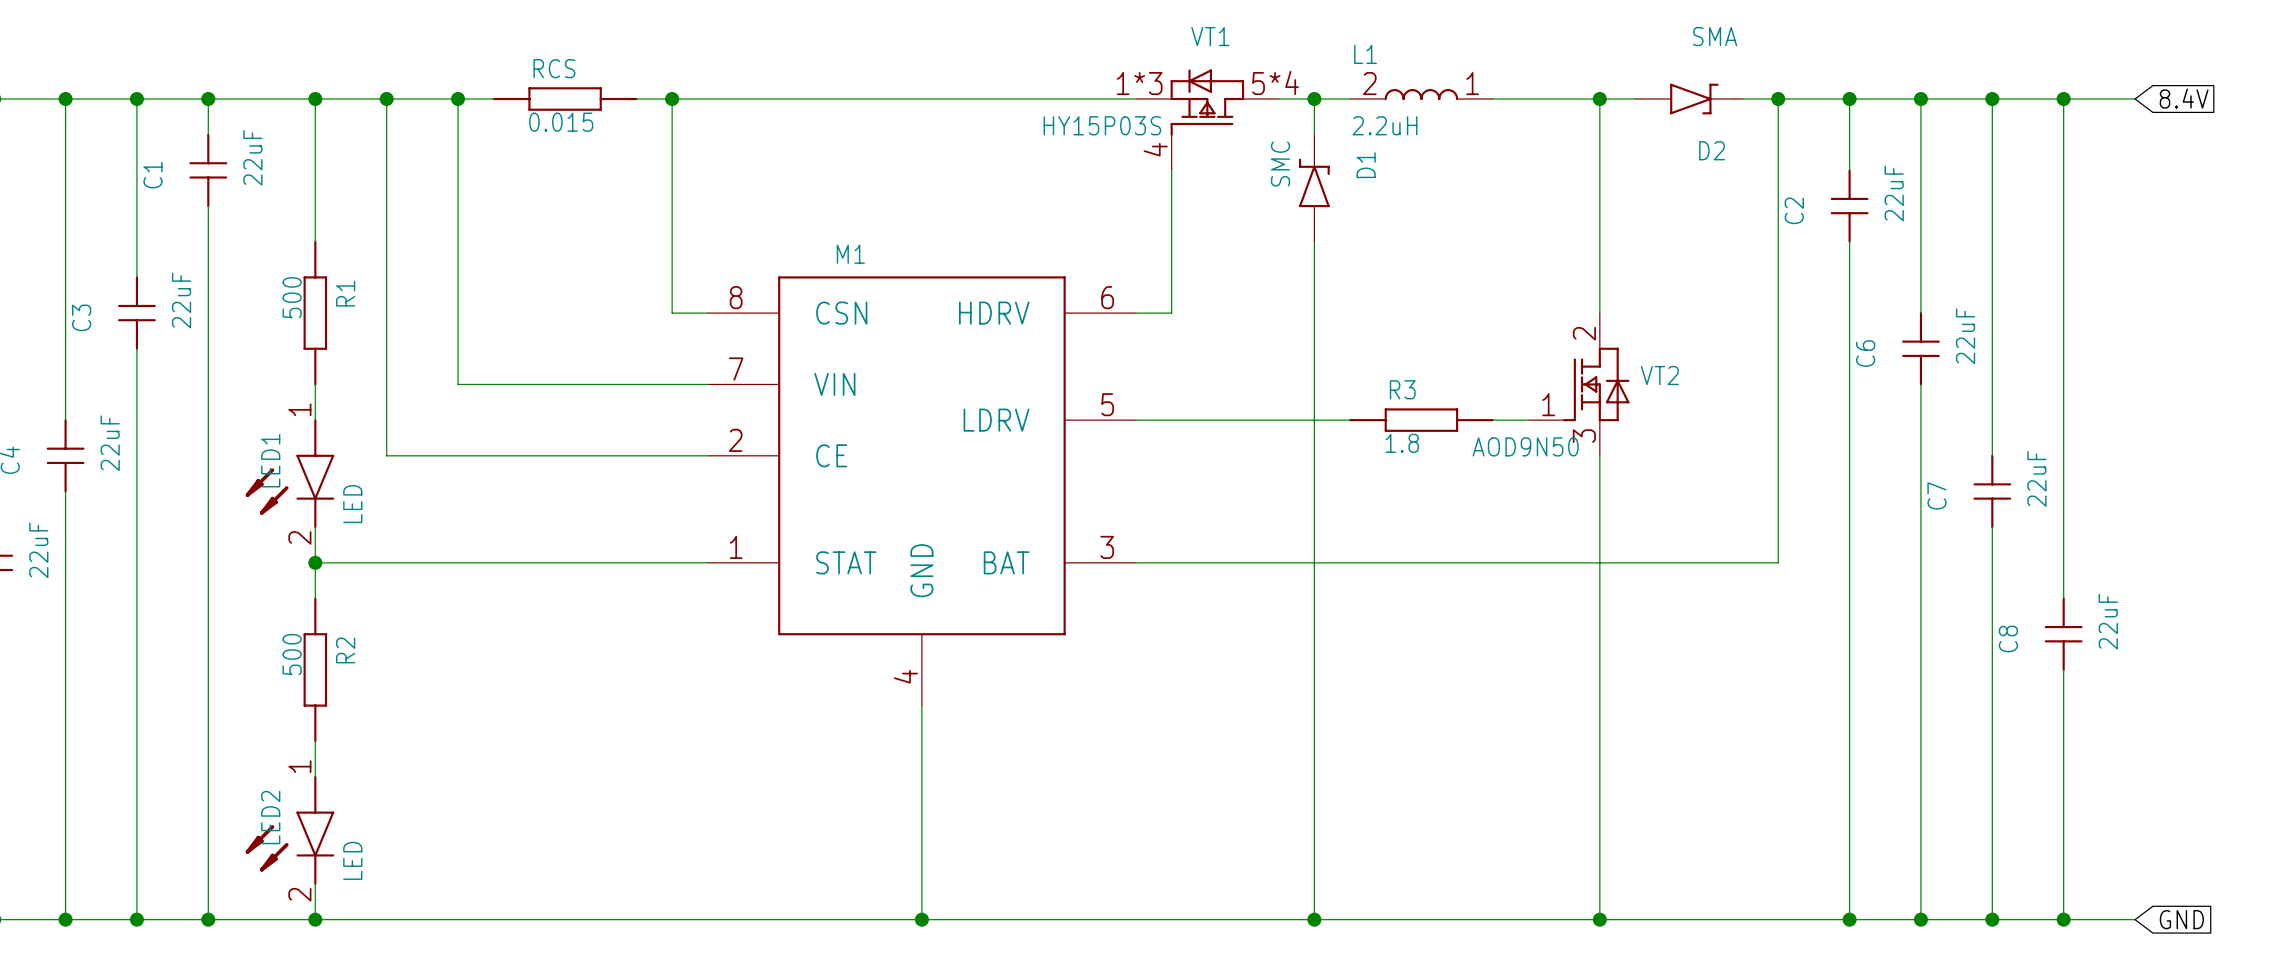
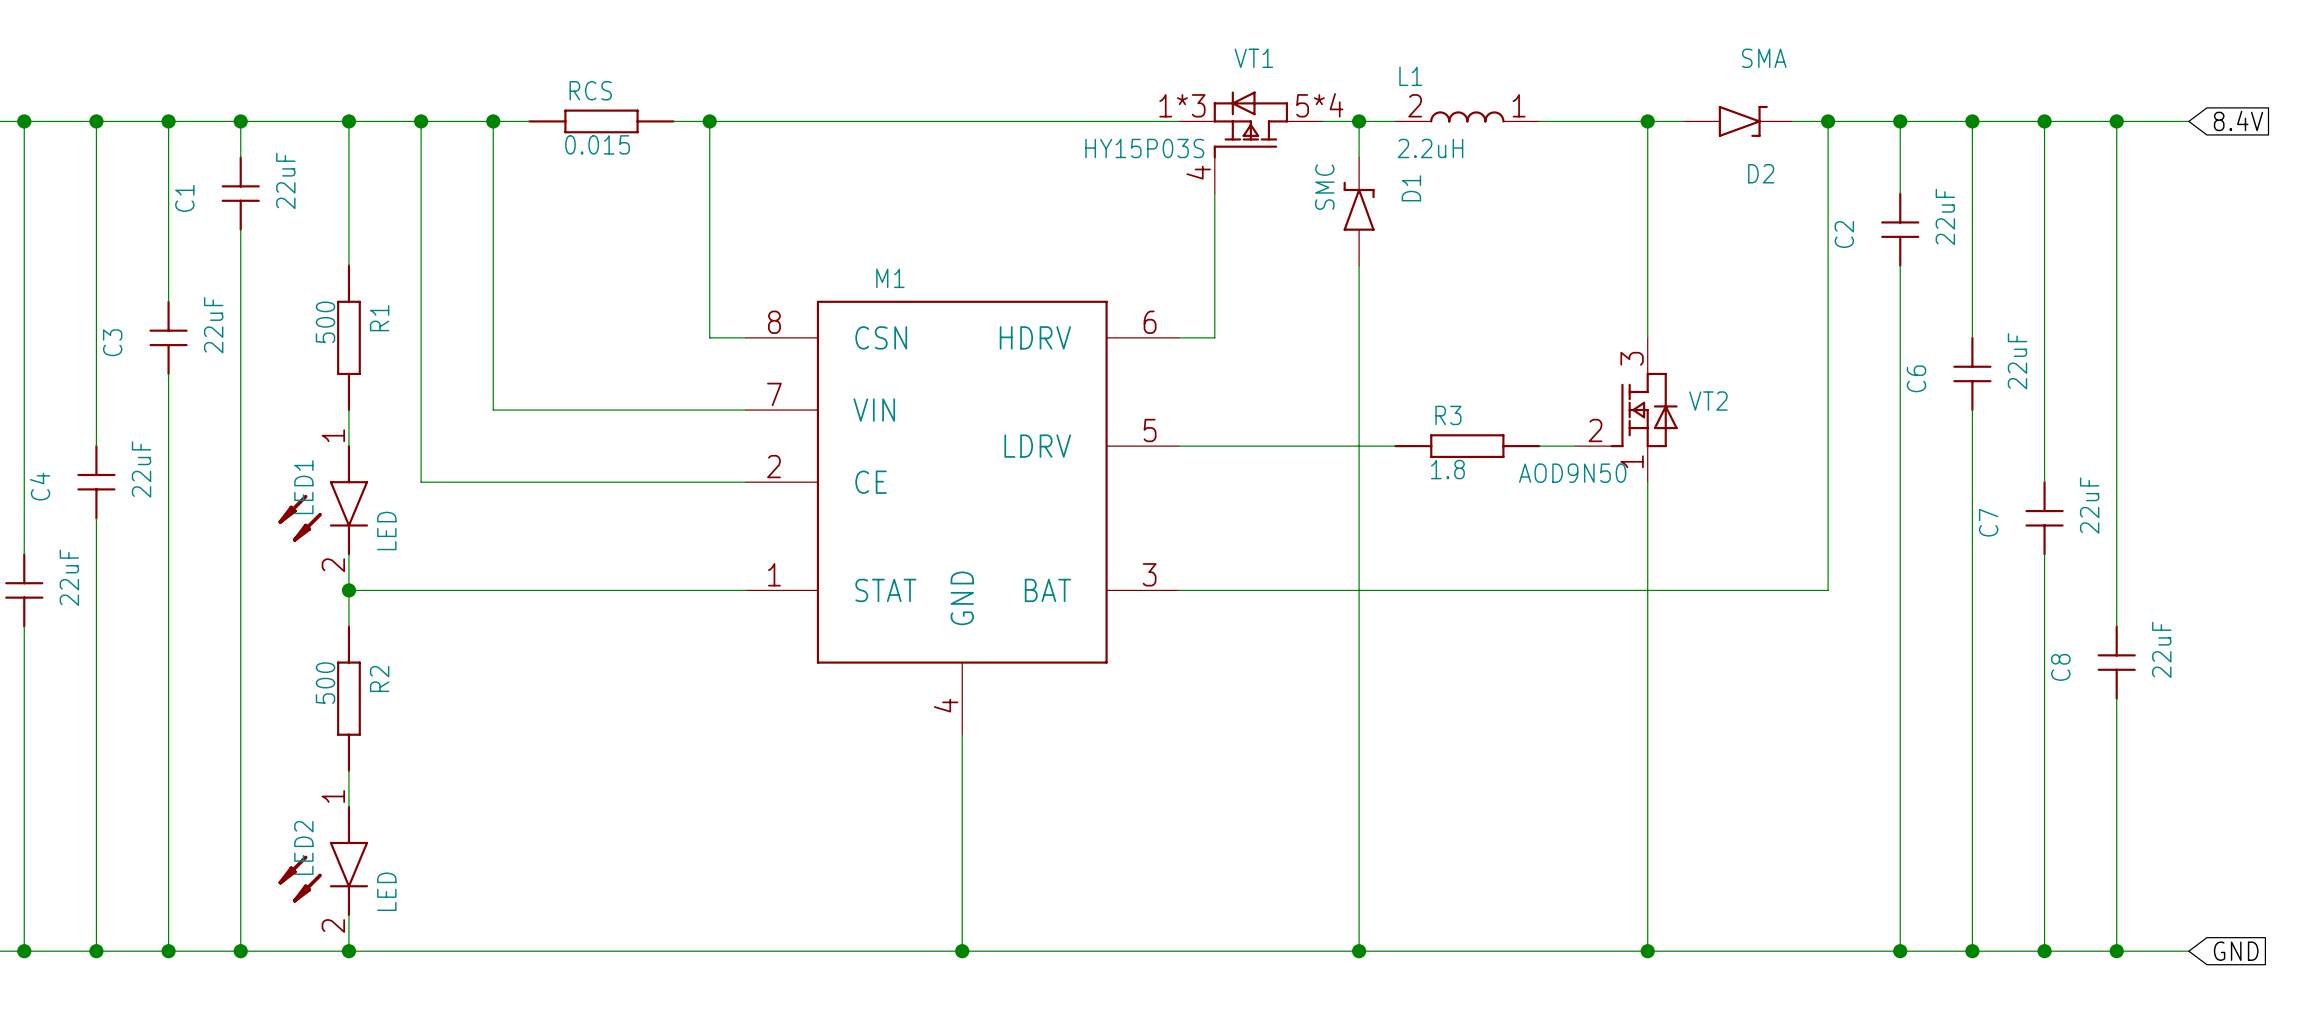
VT2 pin number: 2 (1584, 333) -> 3 (1632, 358)
VT2 pin number: 1 (1548, 404) -> 2 (1595, 430)
VT2 pin number: 3 (1584, 436) -> 1 (1632, 461)

